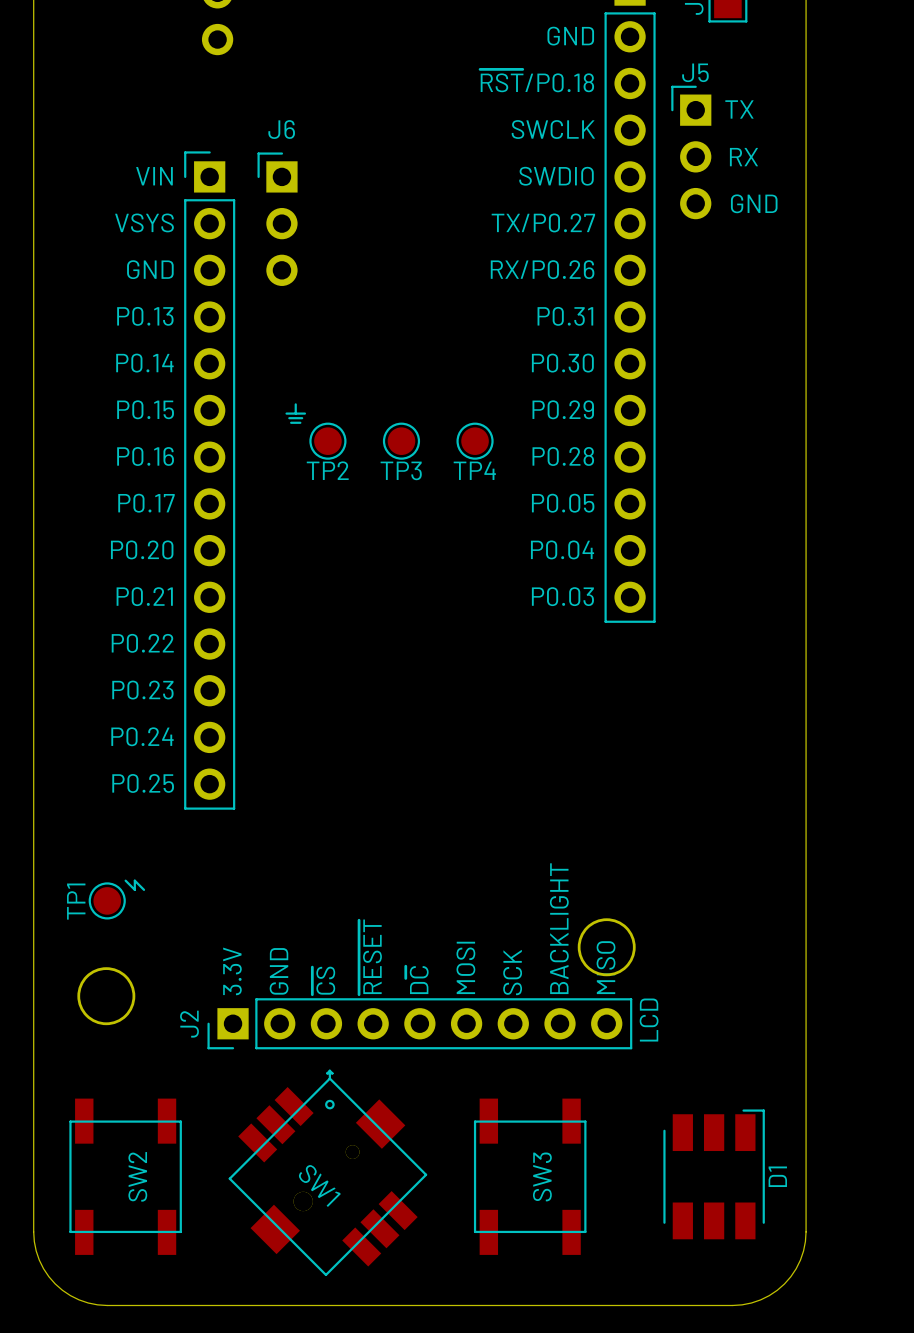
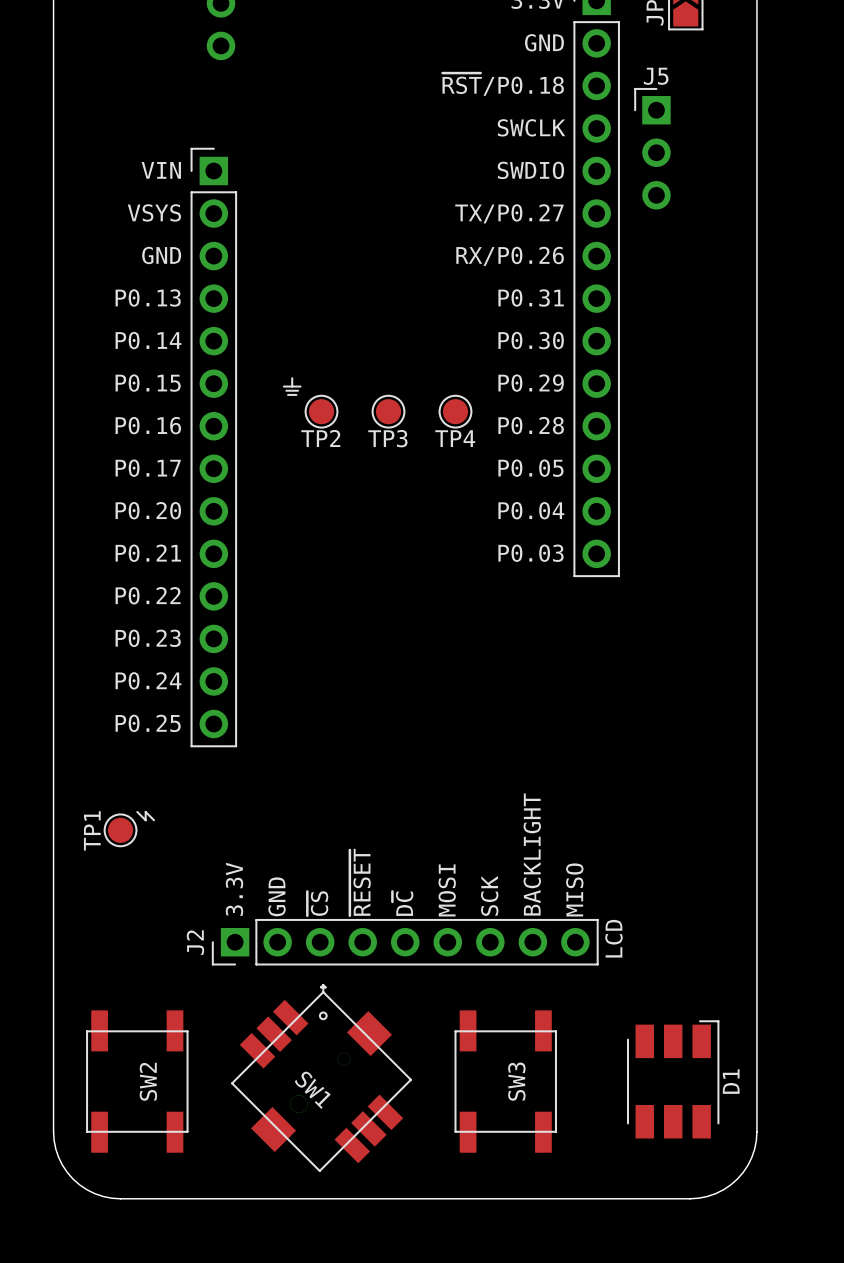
text: TX (739, 109) -> none
text: RX (743, 157) -> none
text: GND (754, 203) -> none
J6: (277, 219) -> none
round board edge: [577, 918, 636, 977] -> none
round board edge: [77, 967, 136, 1026] -> none

